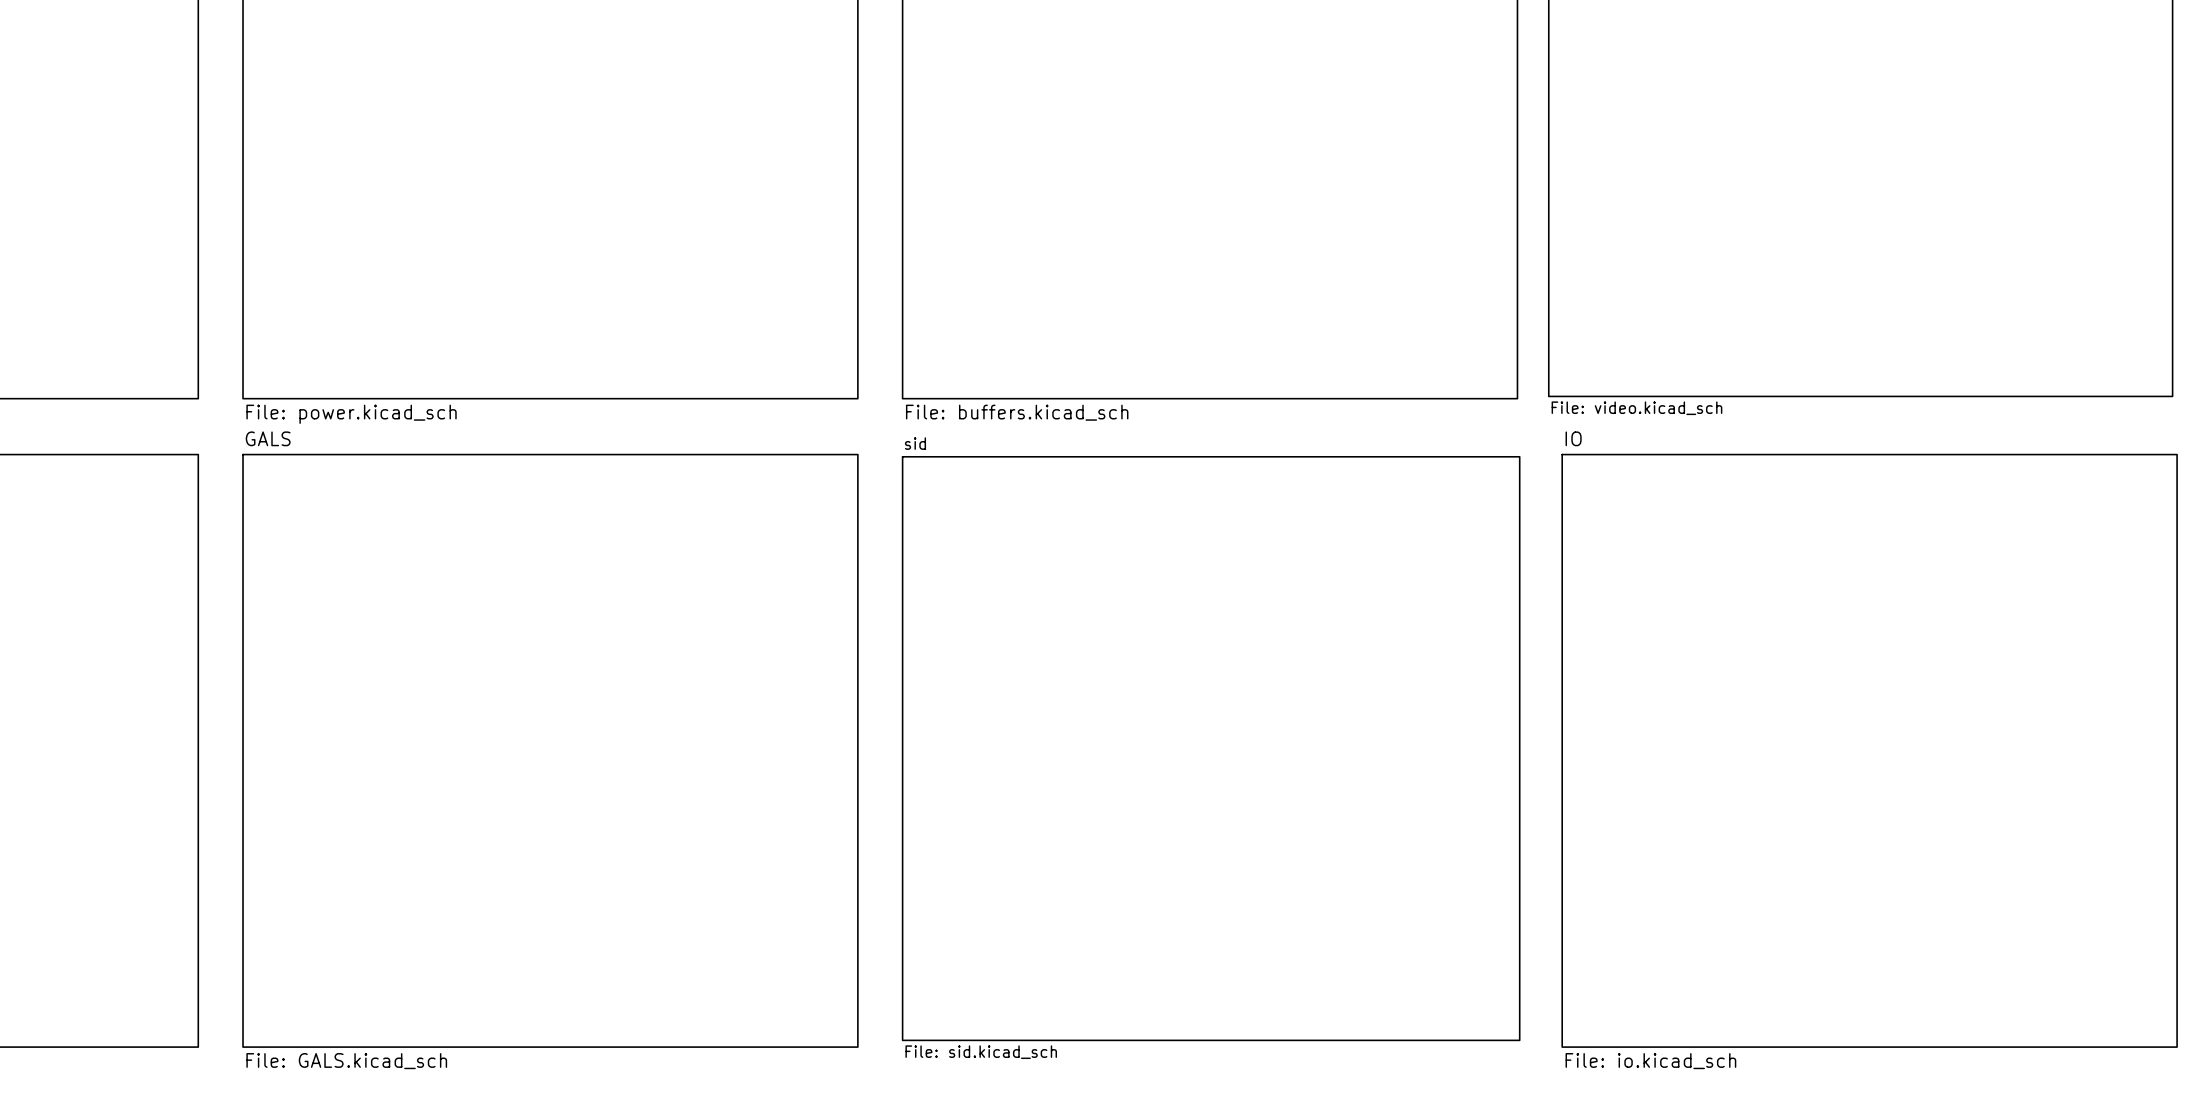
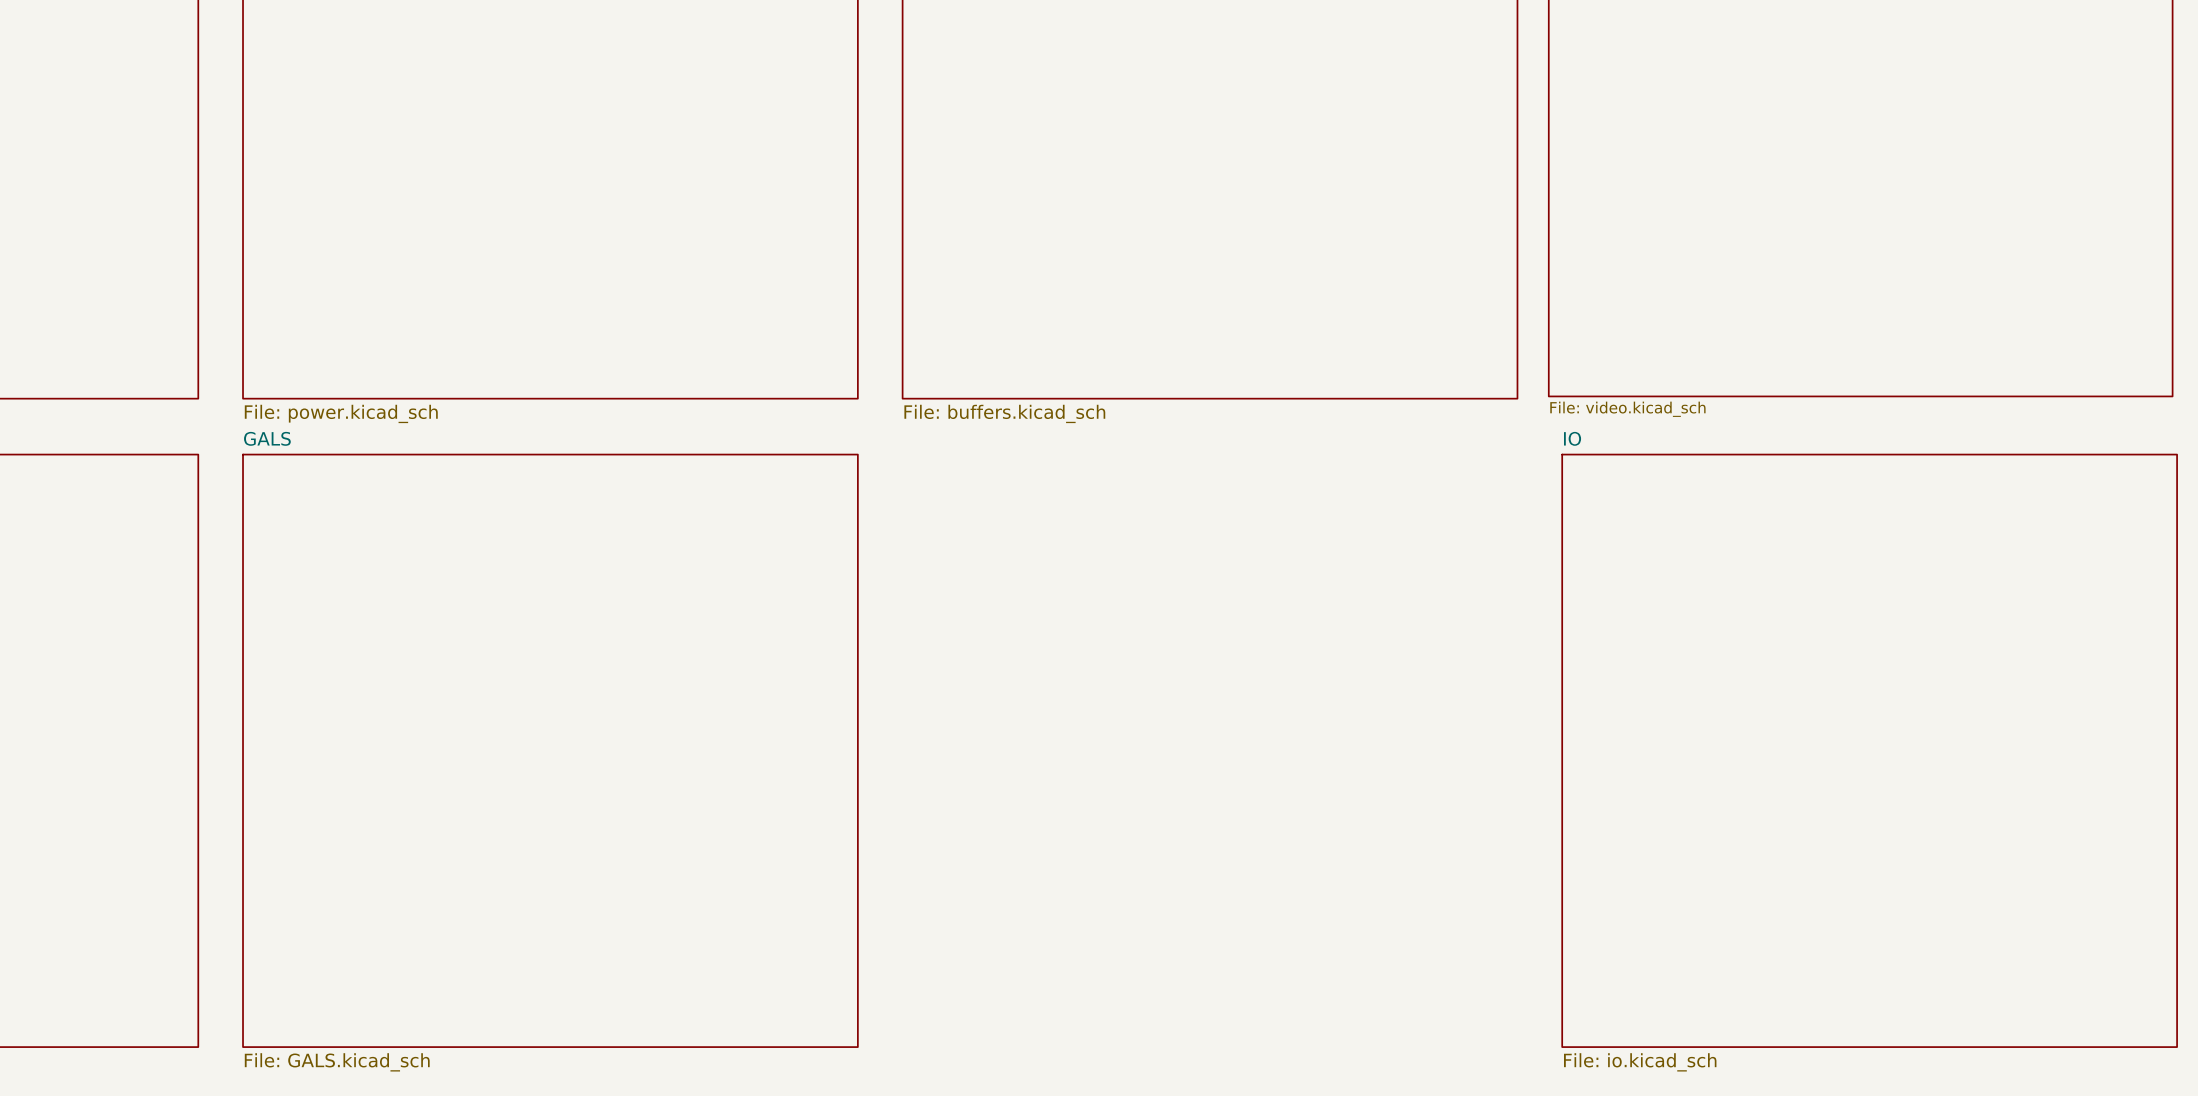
sheet sid: File: sid.kicad_sch (1211, 748) -> none

